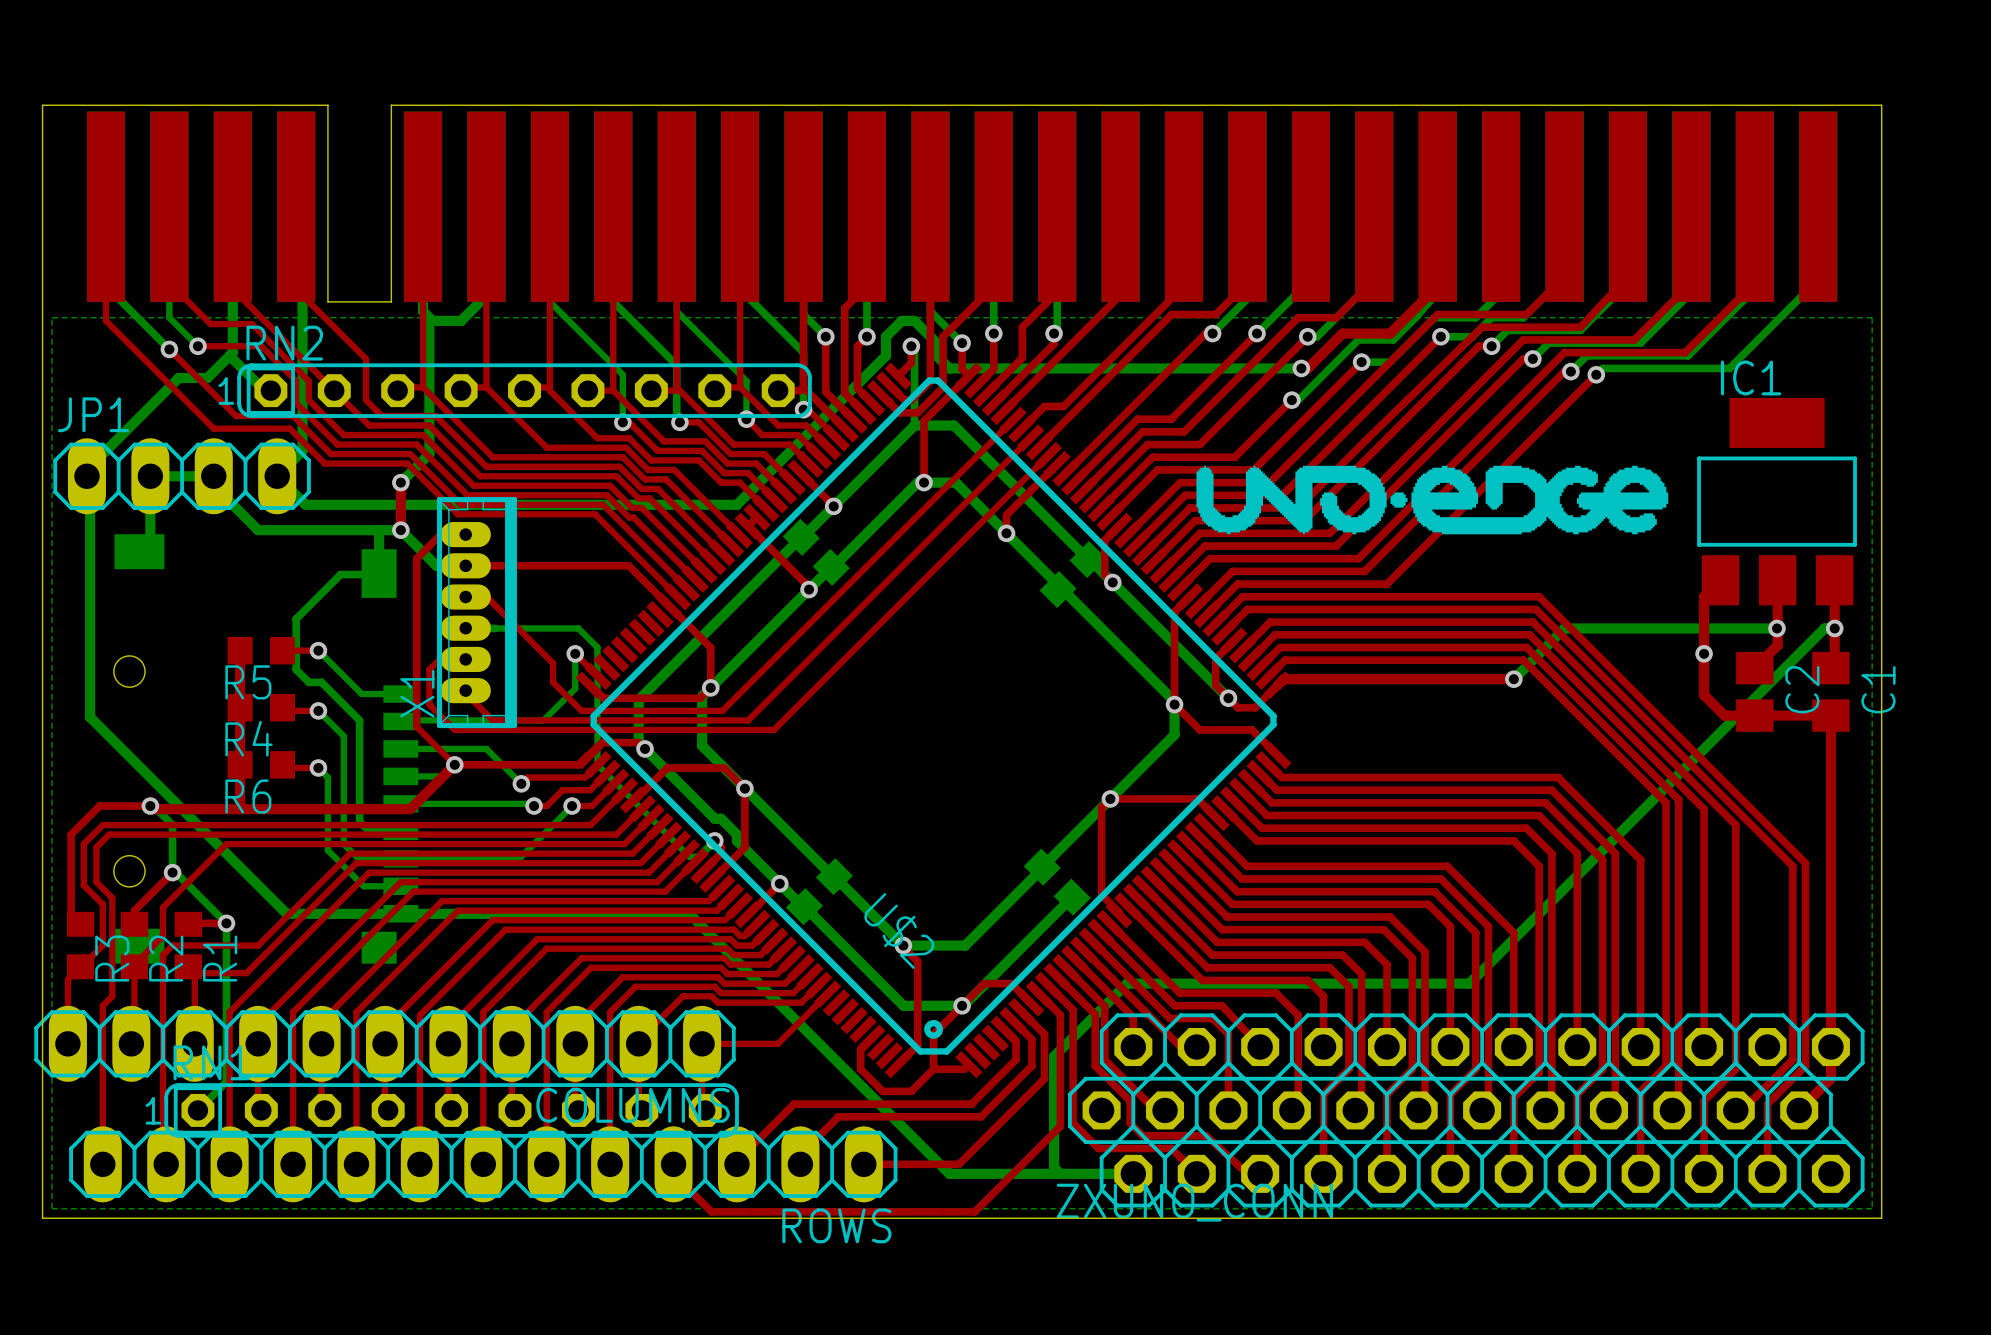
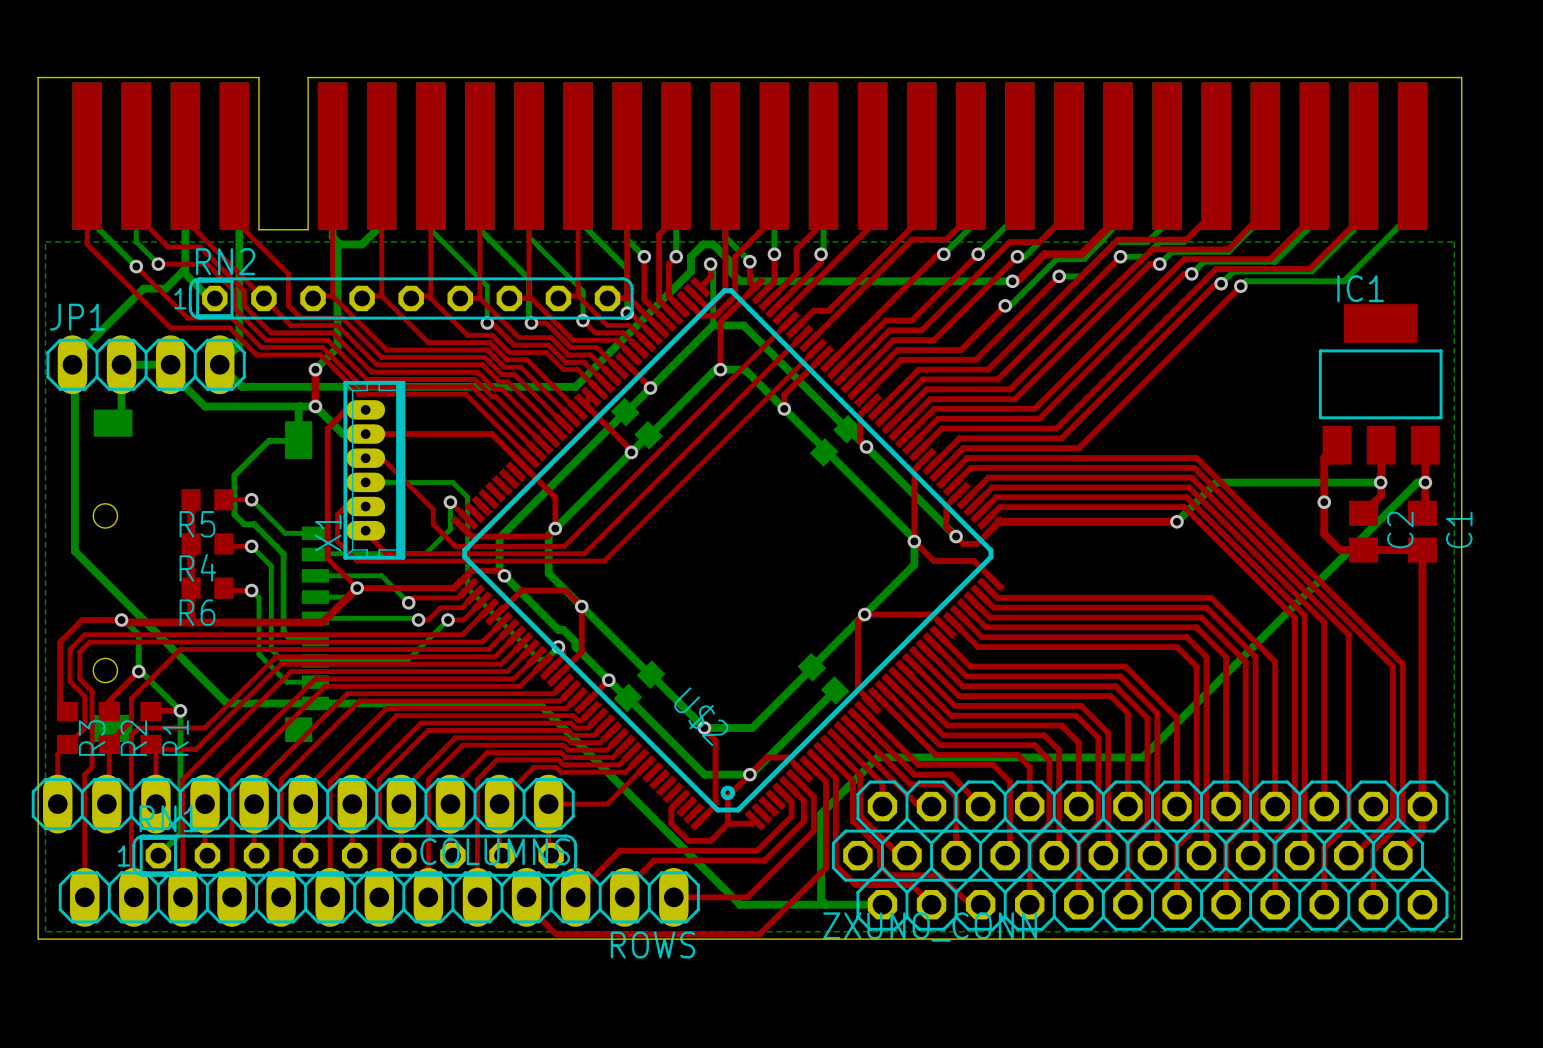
drawing: [1196, 465, 1669, 535] -> none

